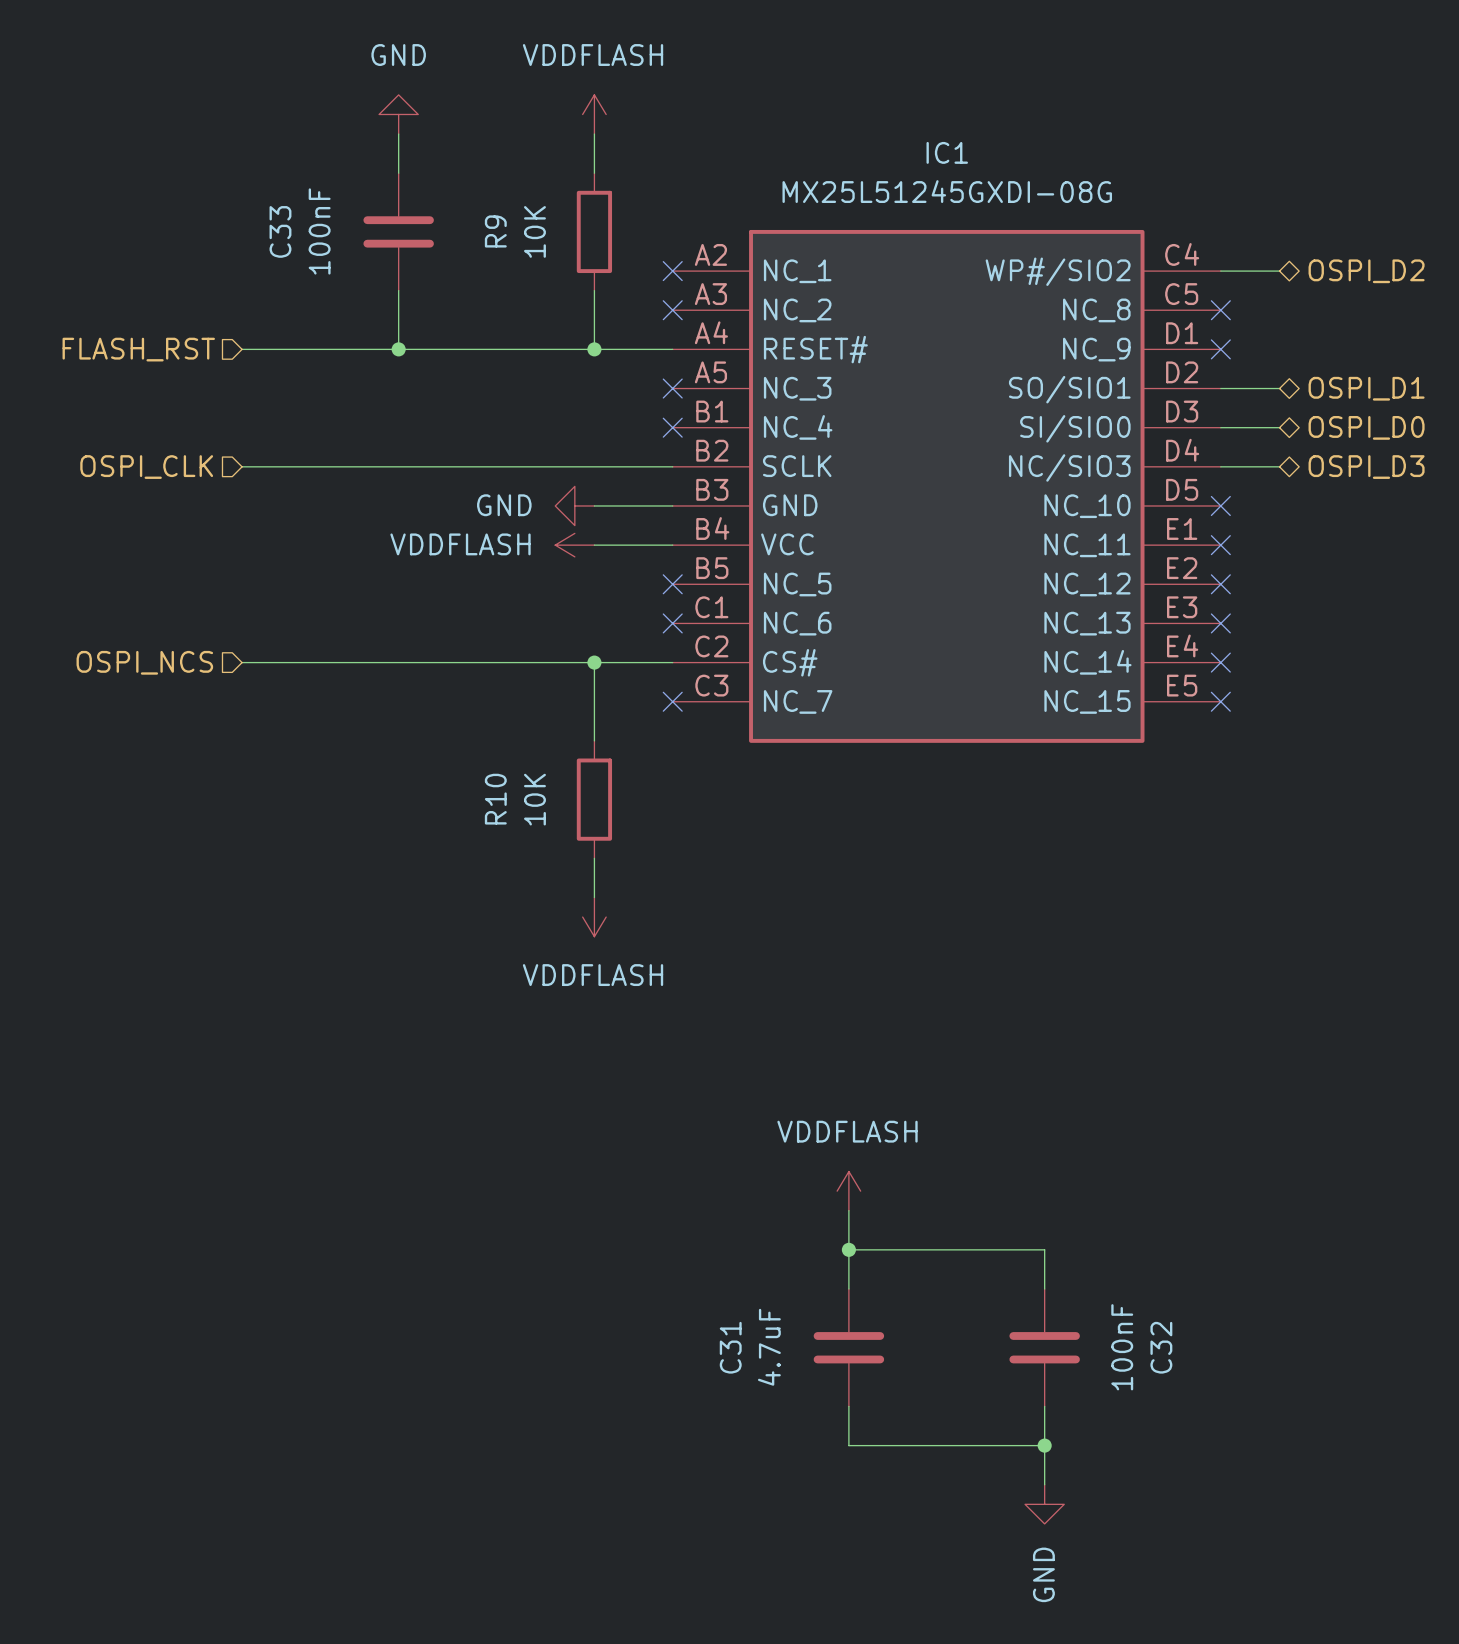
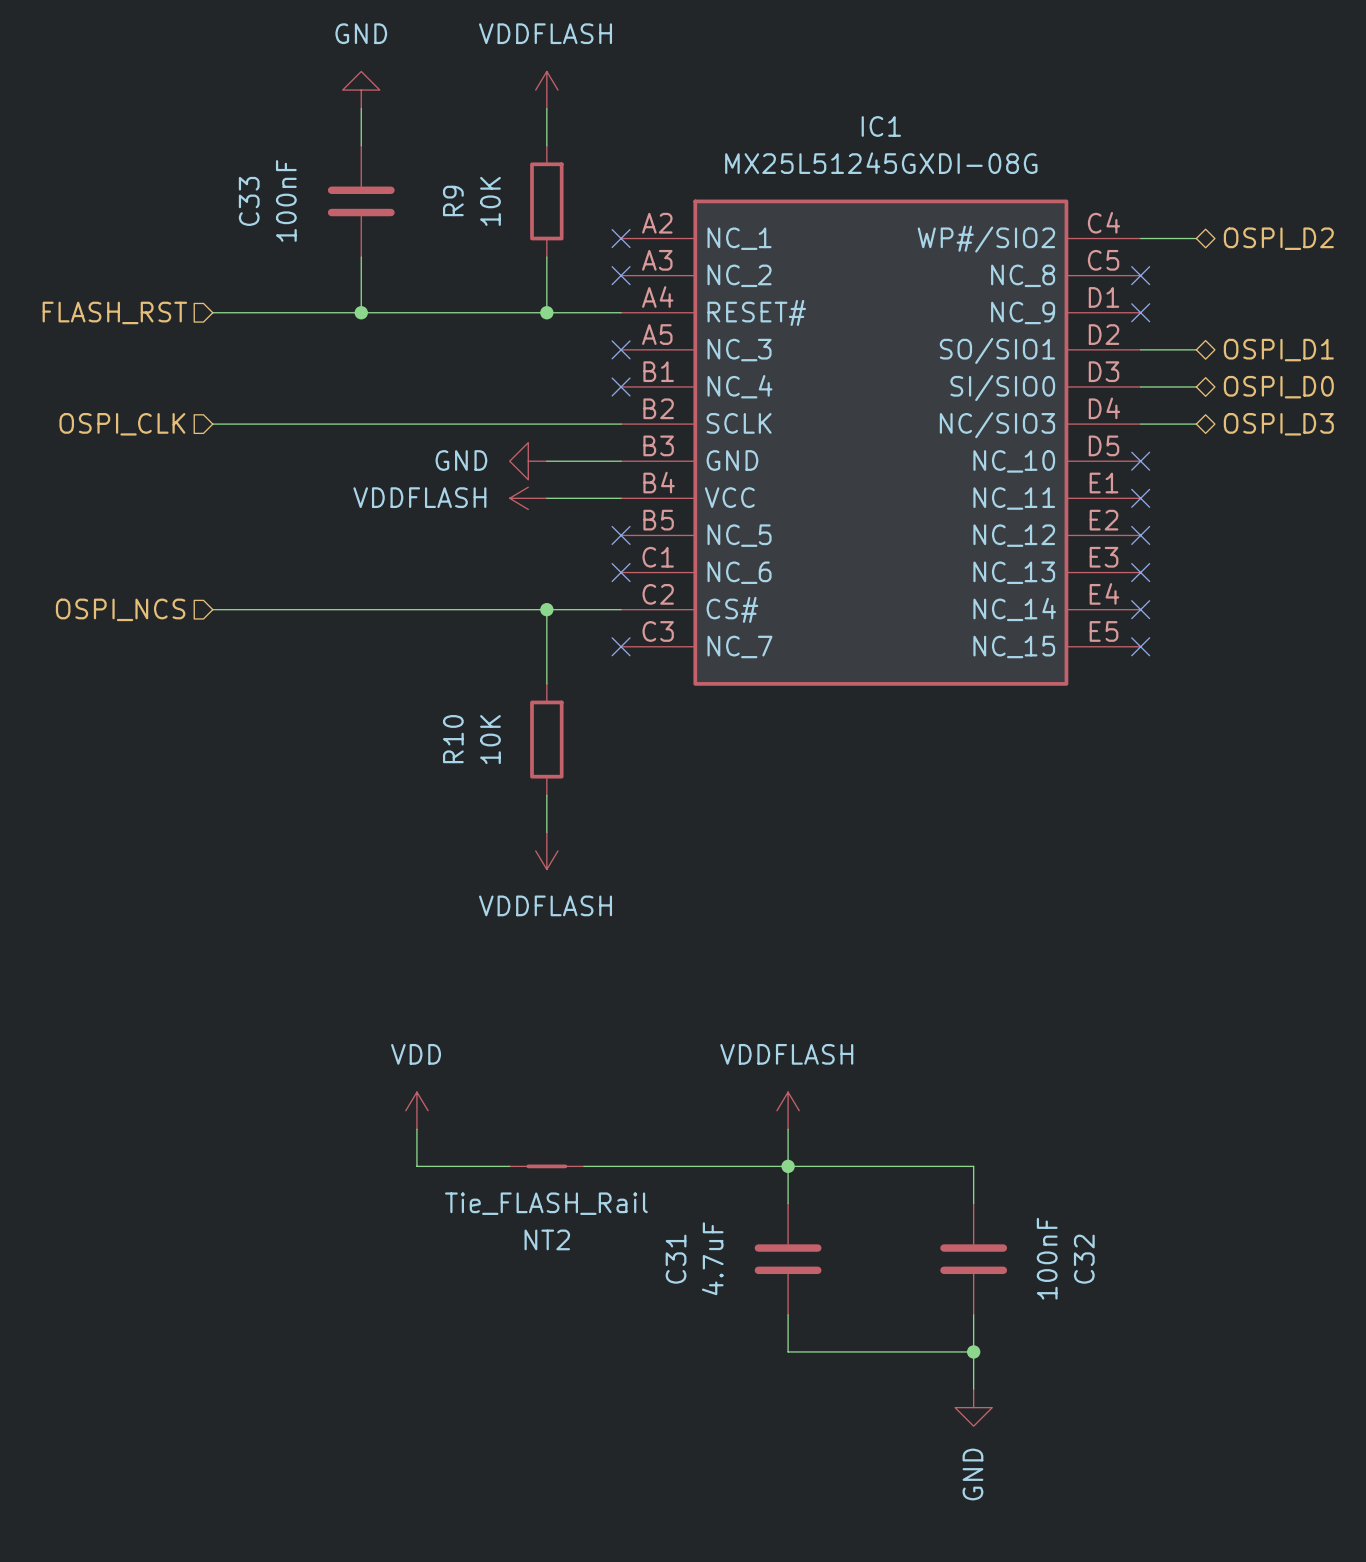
power symbol: none -> VDD (416, 1110)
wire: none -> (416, 1129) (416, 1166) (509, 1166)
NT2: none -> Tie_FLASH_Rail (546, 1166)
wire: none -> (583, 1166) (788, 1166)

